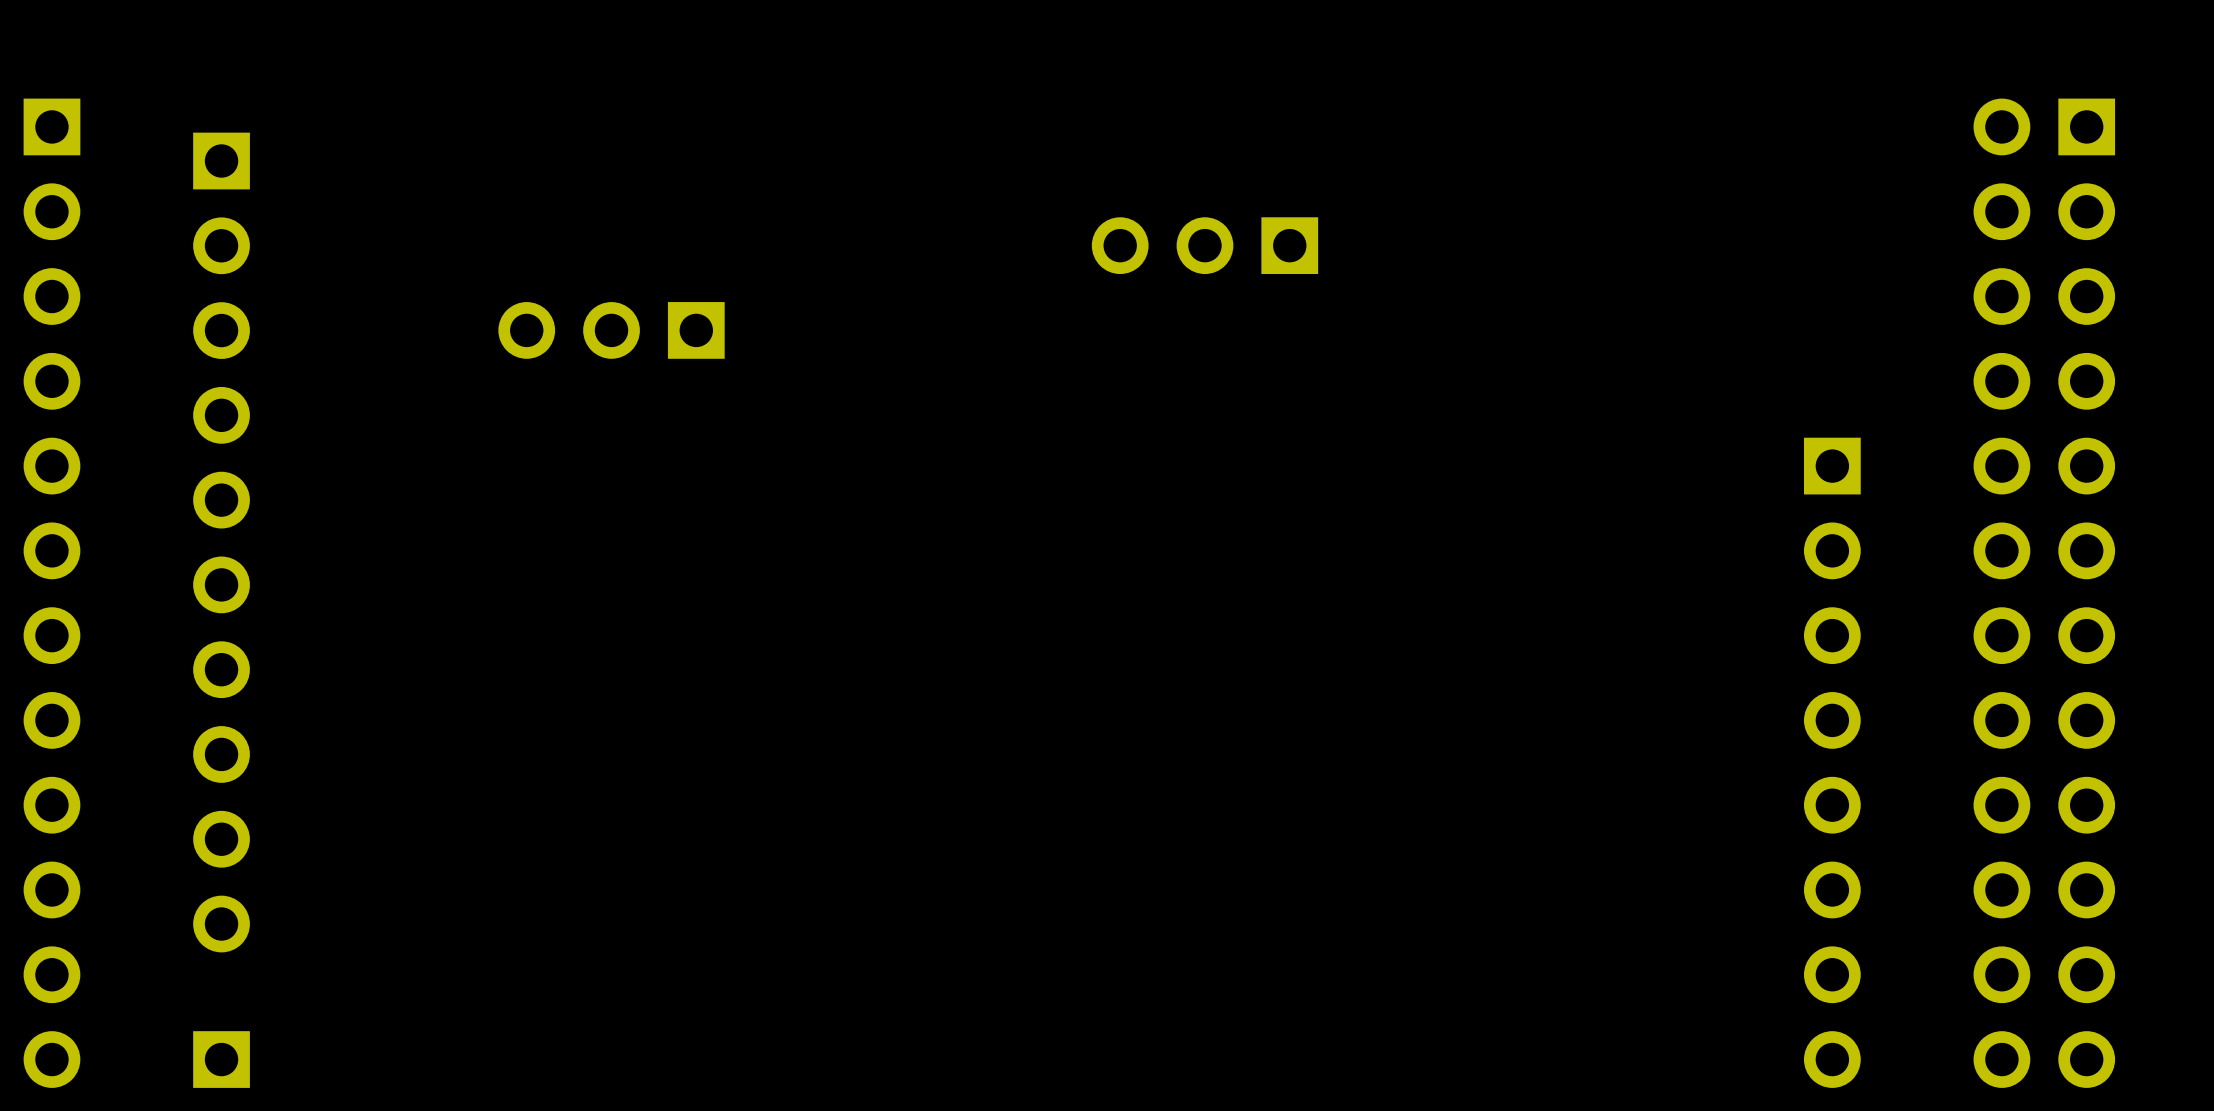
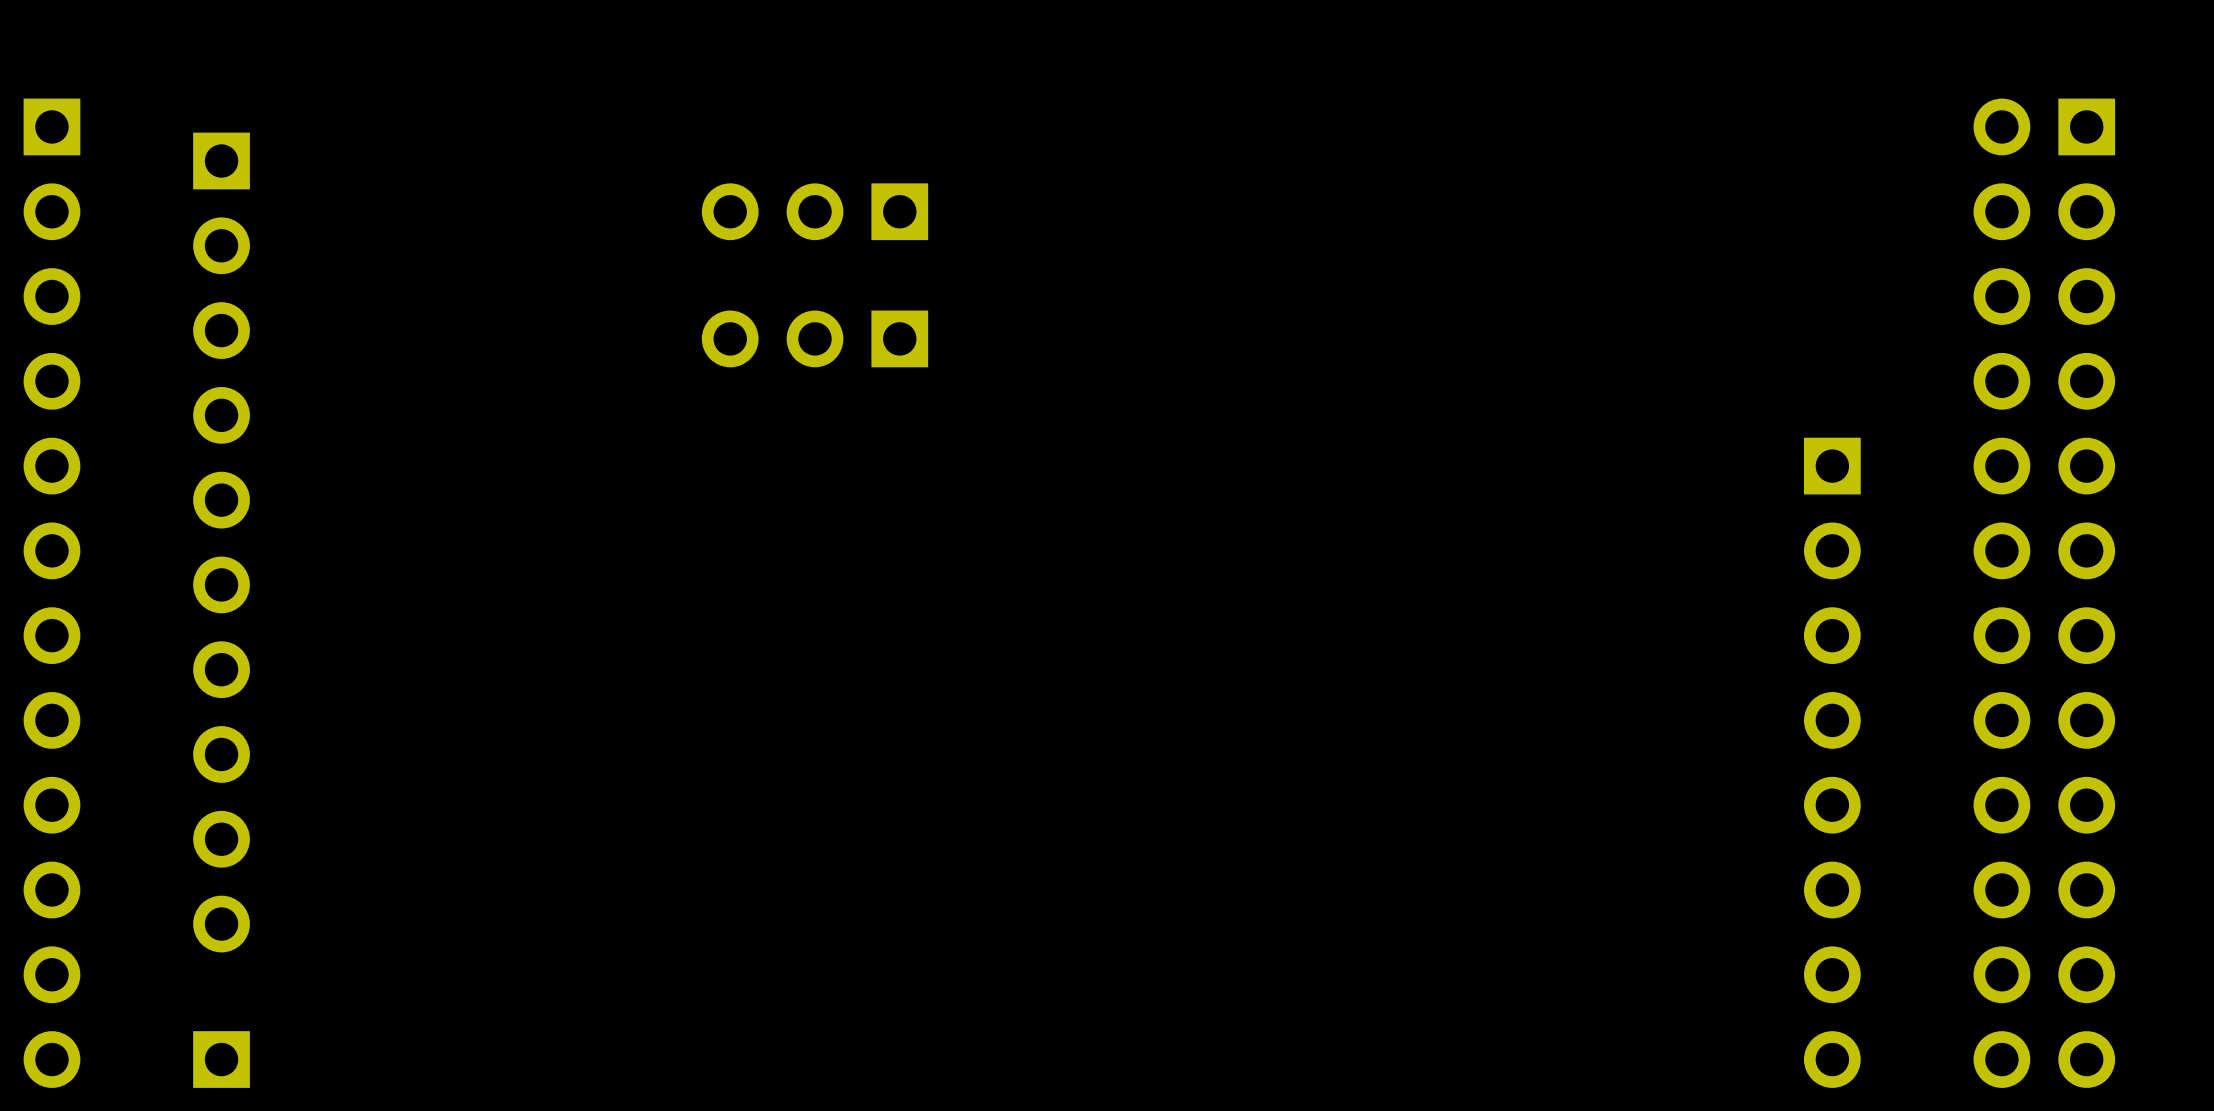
part: none -> (814, 211)
part: (1204, 245) -> none
part: (611, 330) -> none
part: none -> (814, 338)

